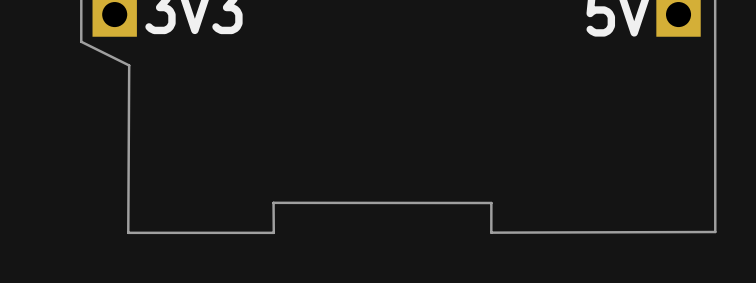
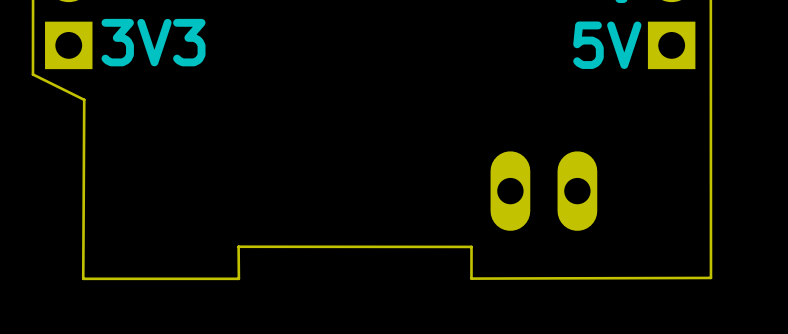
part: none -> (543, 191)

